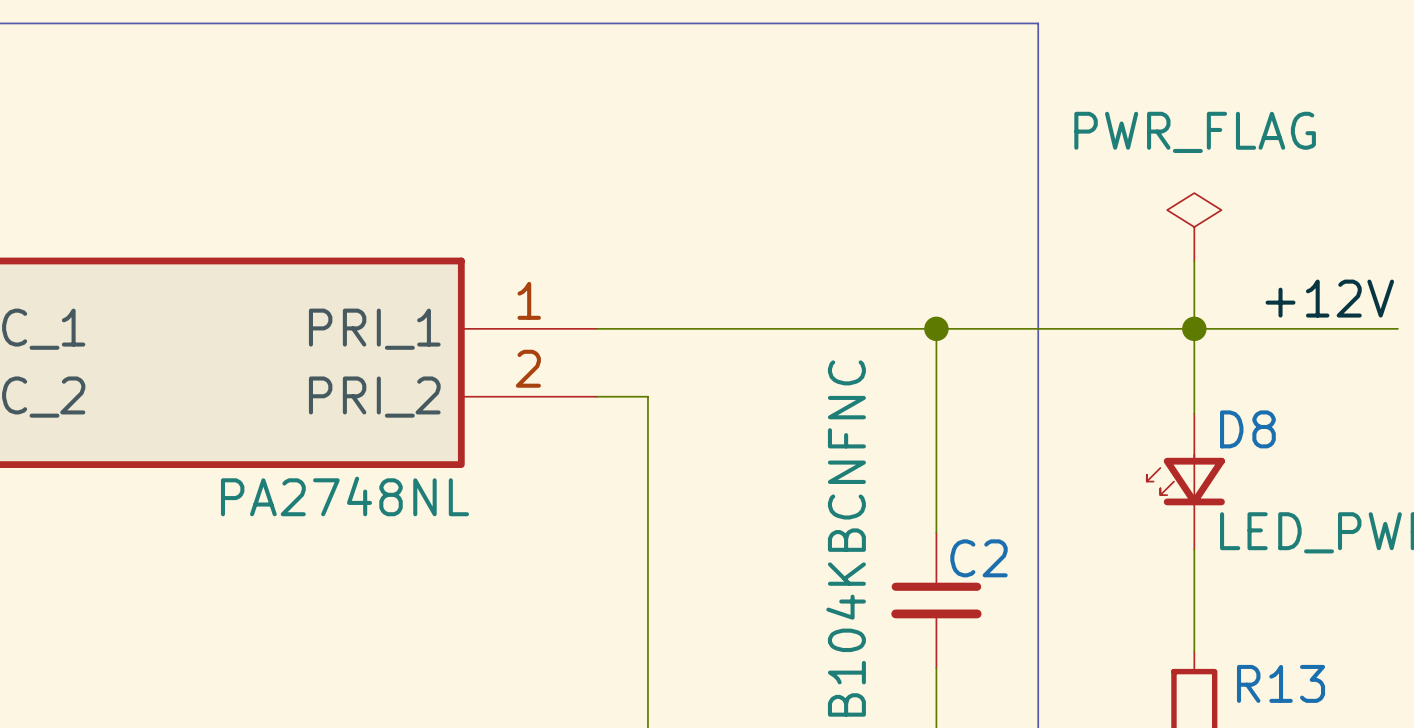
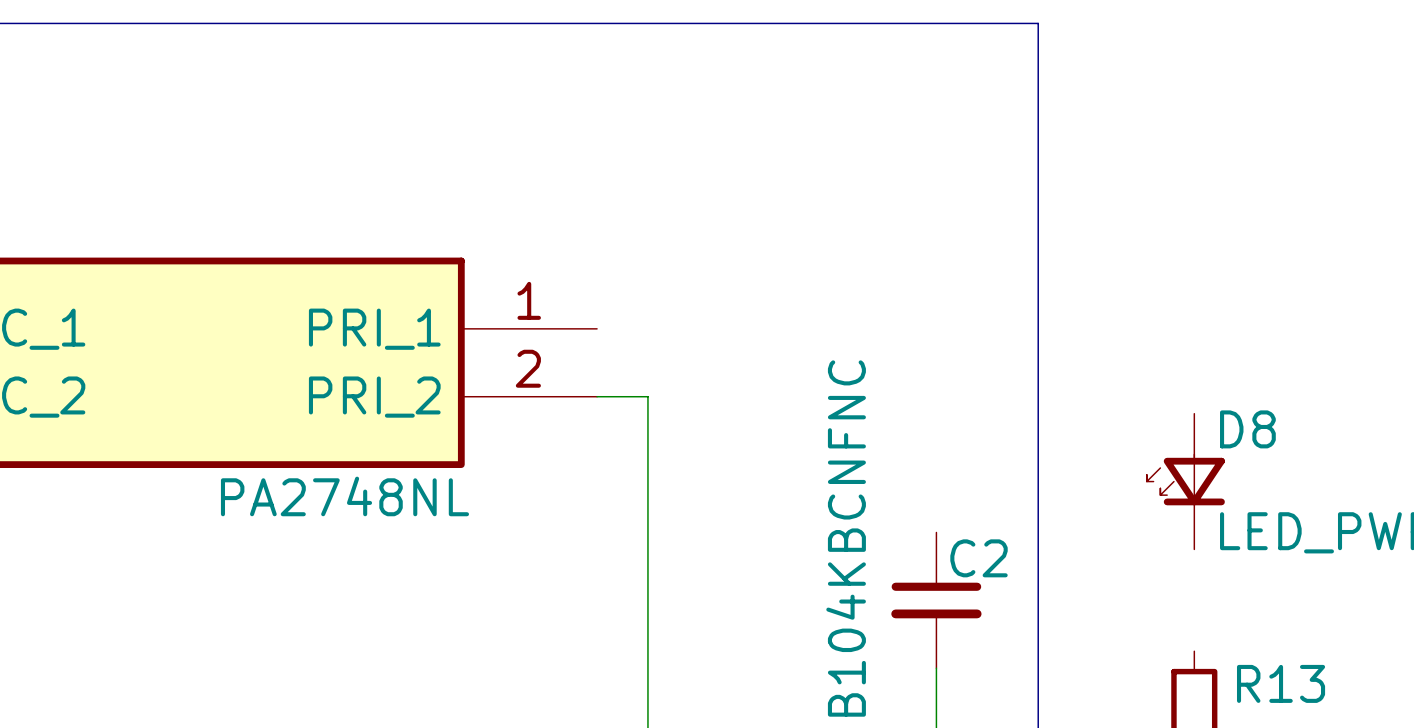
power symbol: PWR_FLAG (1194, 227) -> none
wire: (1194, 260) (1194, 413) -> none
label: +12V (1329, 298) -> none
wire: (597, 328) (1397, 328) -> none
wire: (936, 328) (936, 532) -> none
junction: (936, 328) -> none
junction: (1194, 328) -> none
wire: (1194, 549) (1194, 651) -> none

